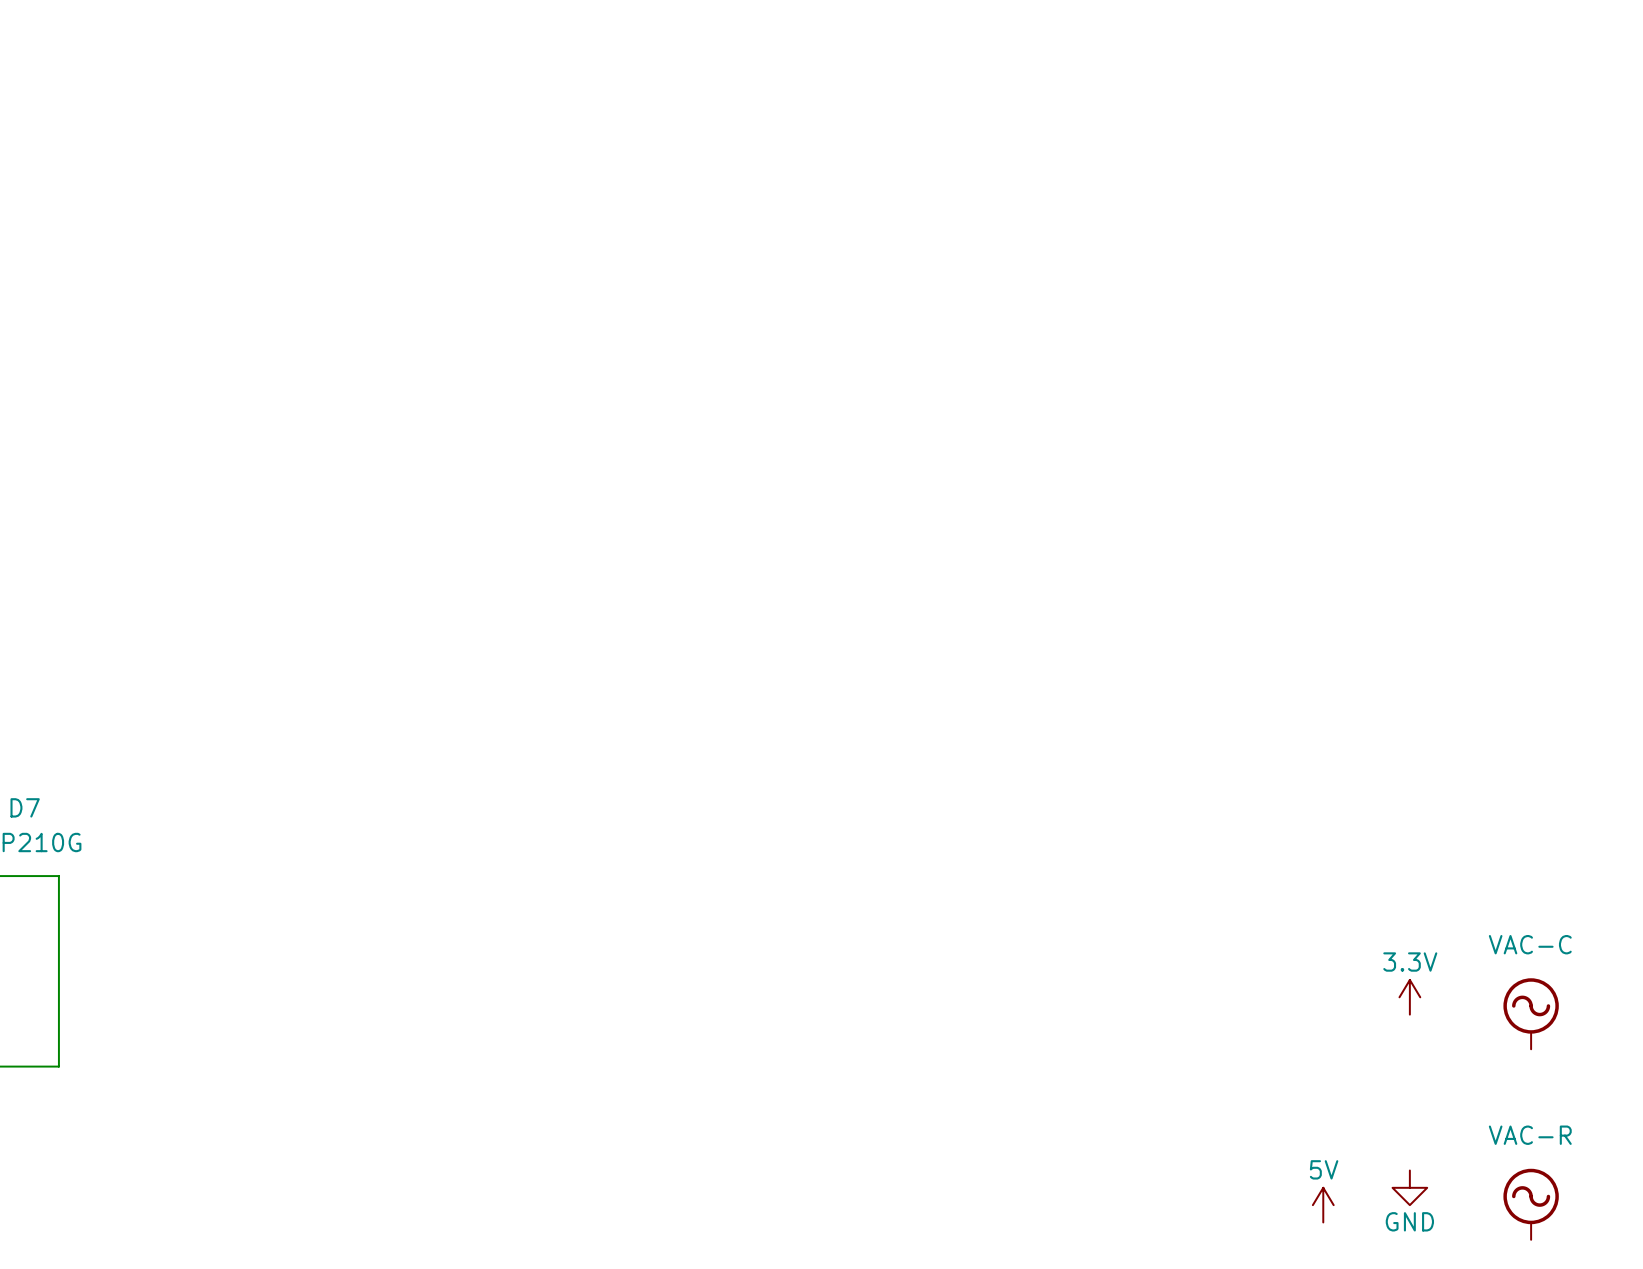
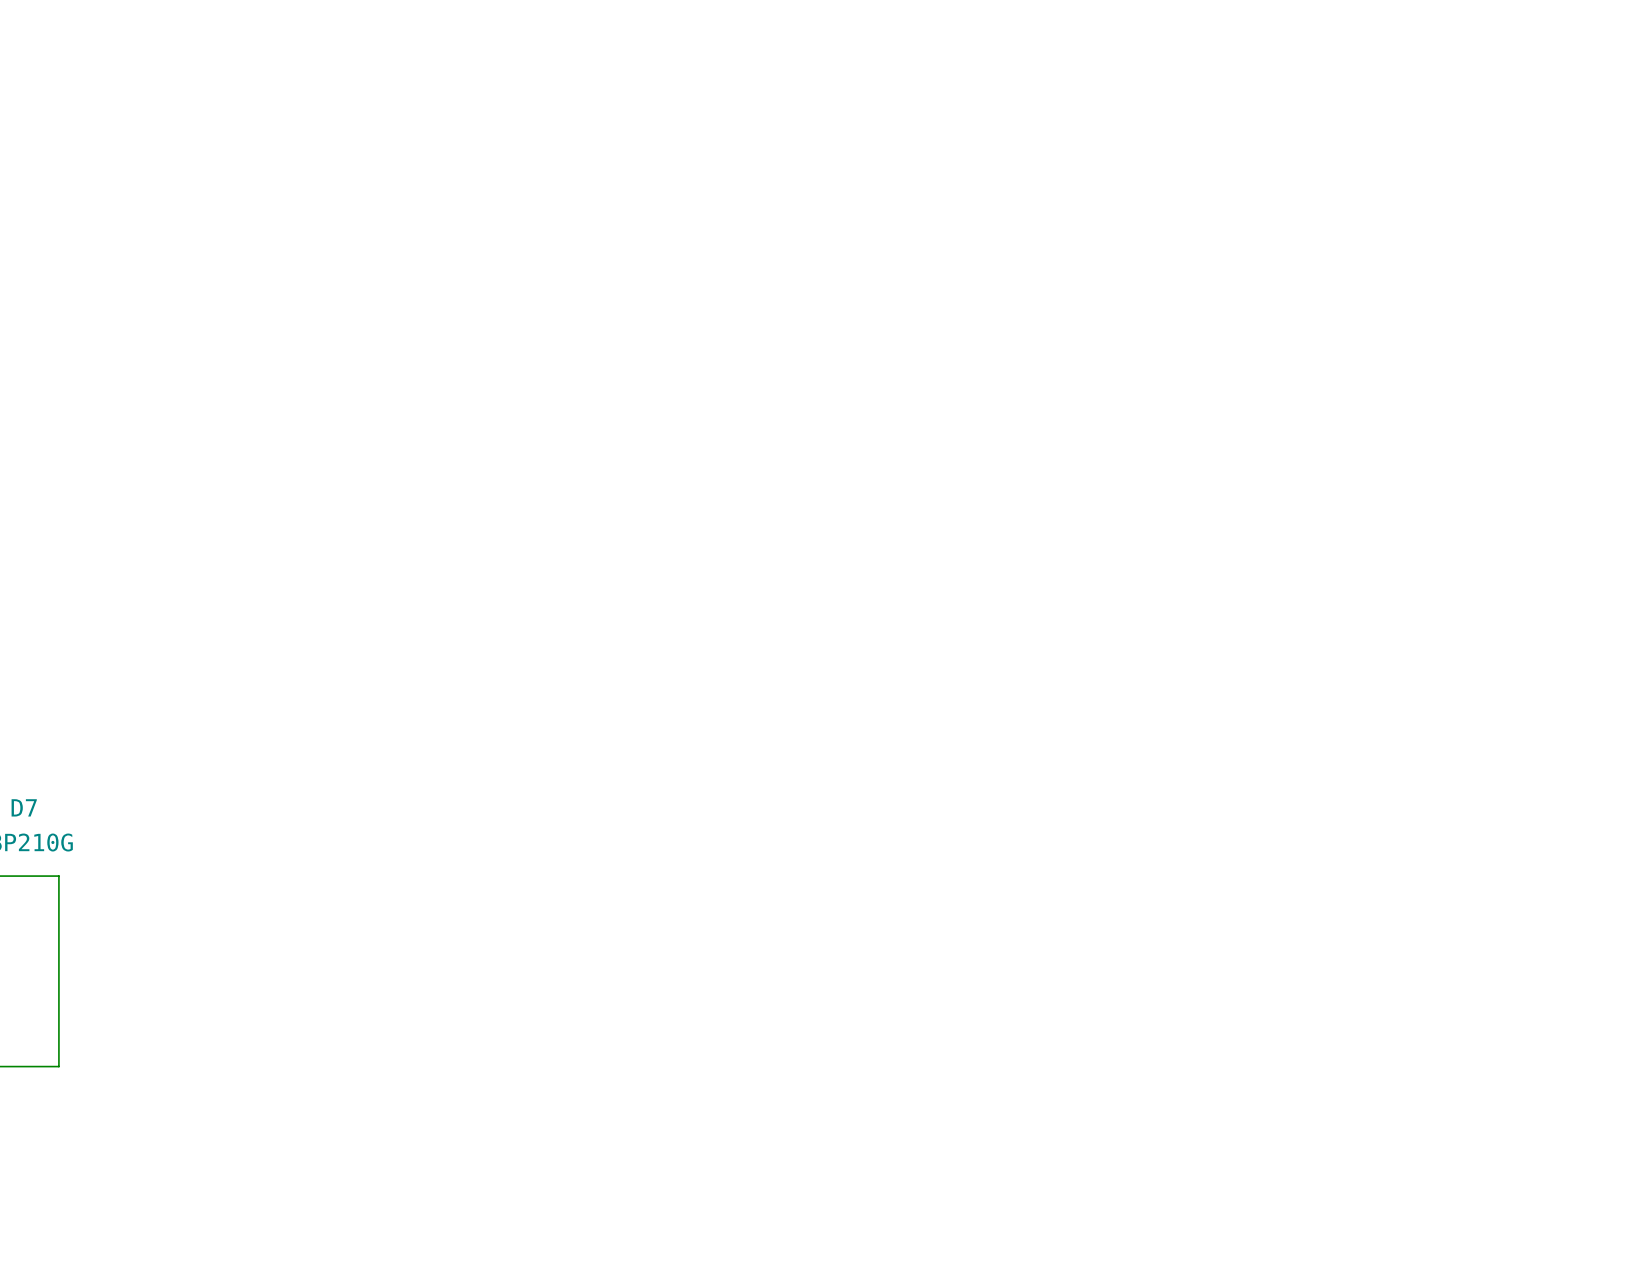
power symbol: 3.3V (1409, 997) -> none
power symbol: VAC-C (1531, 1013) -> none
power symbol: GND (1409, 1187) -> none
power symbol: VAC-R (1531, 1204) -> none
power symbol: 5V (1323, 1205) -> none

